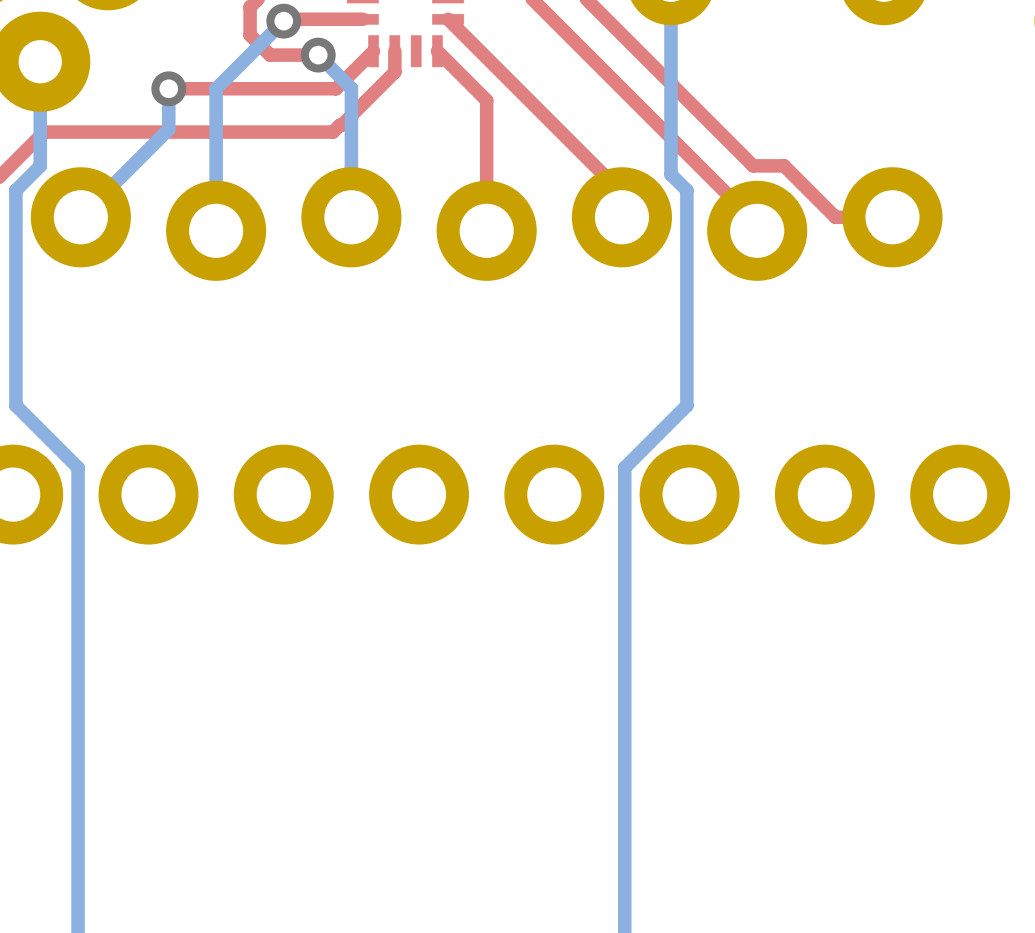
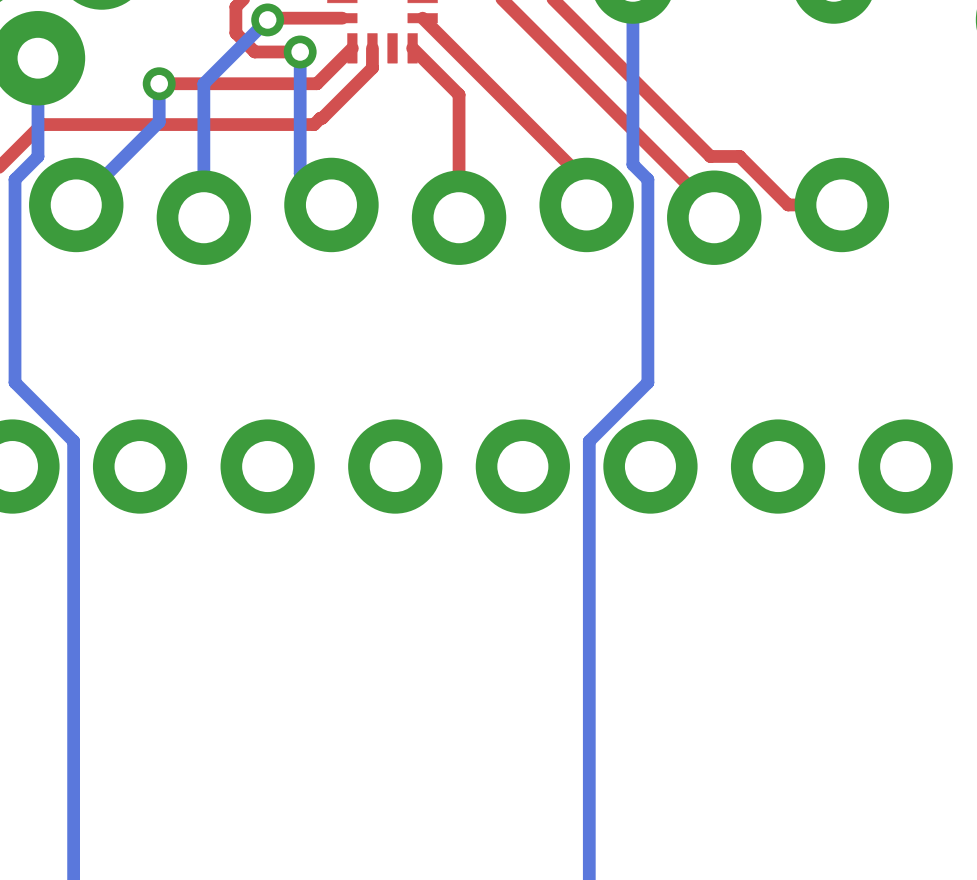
bottom track: (318, 55) (351, 88) (351, 217) -> (300, 51) (300, 173) (331, 204)

